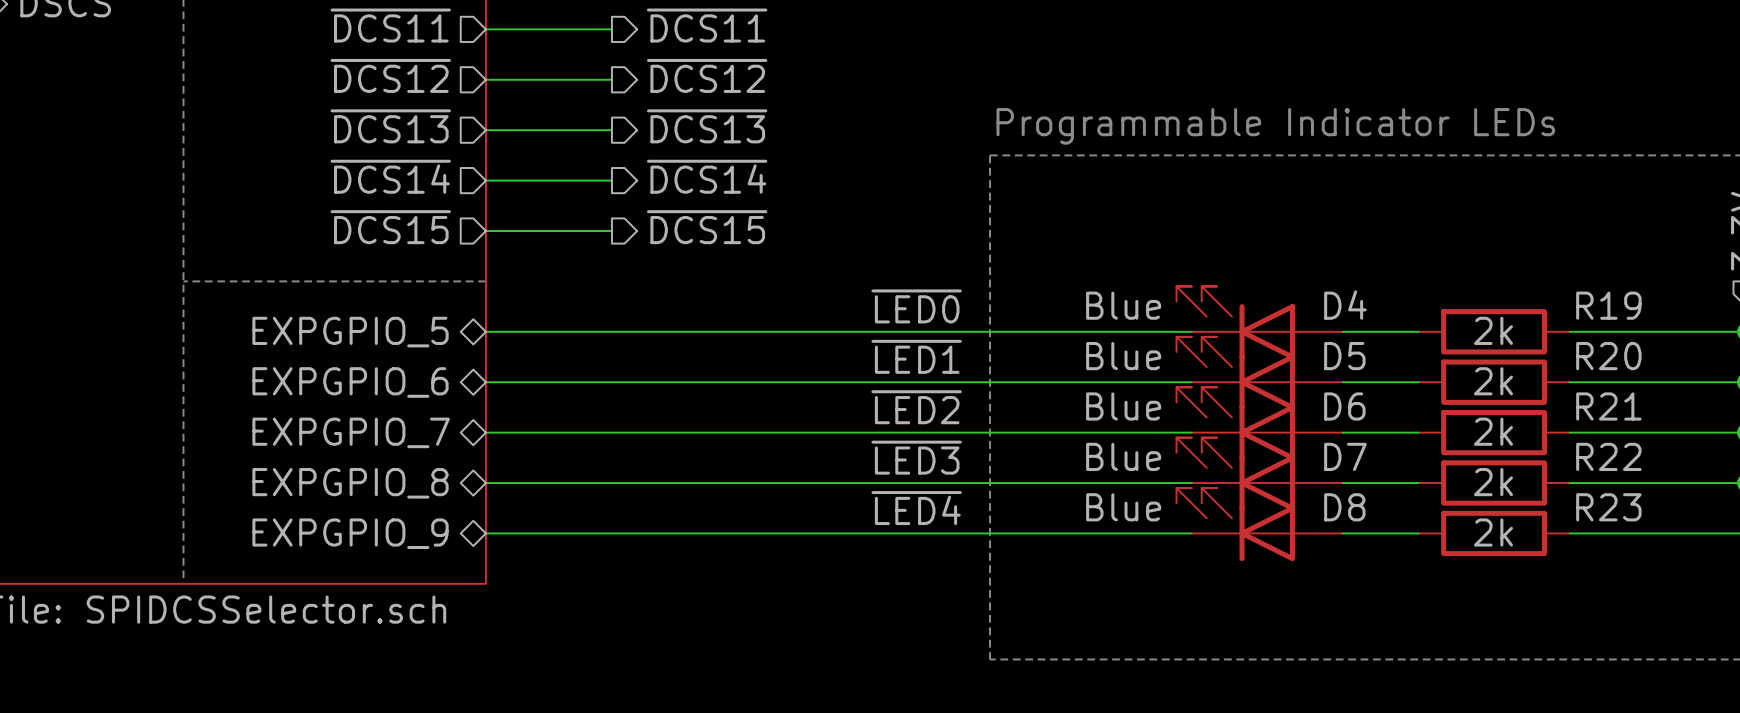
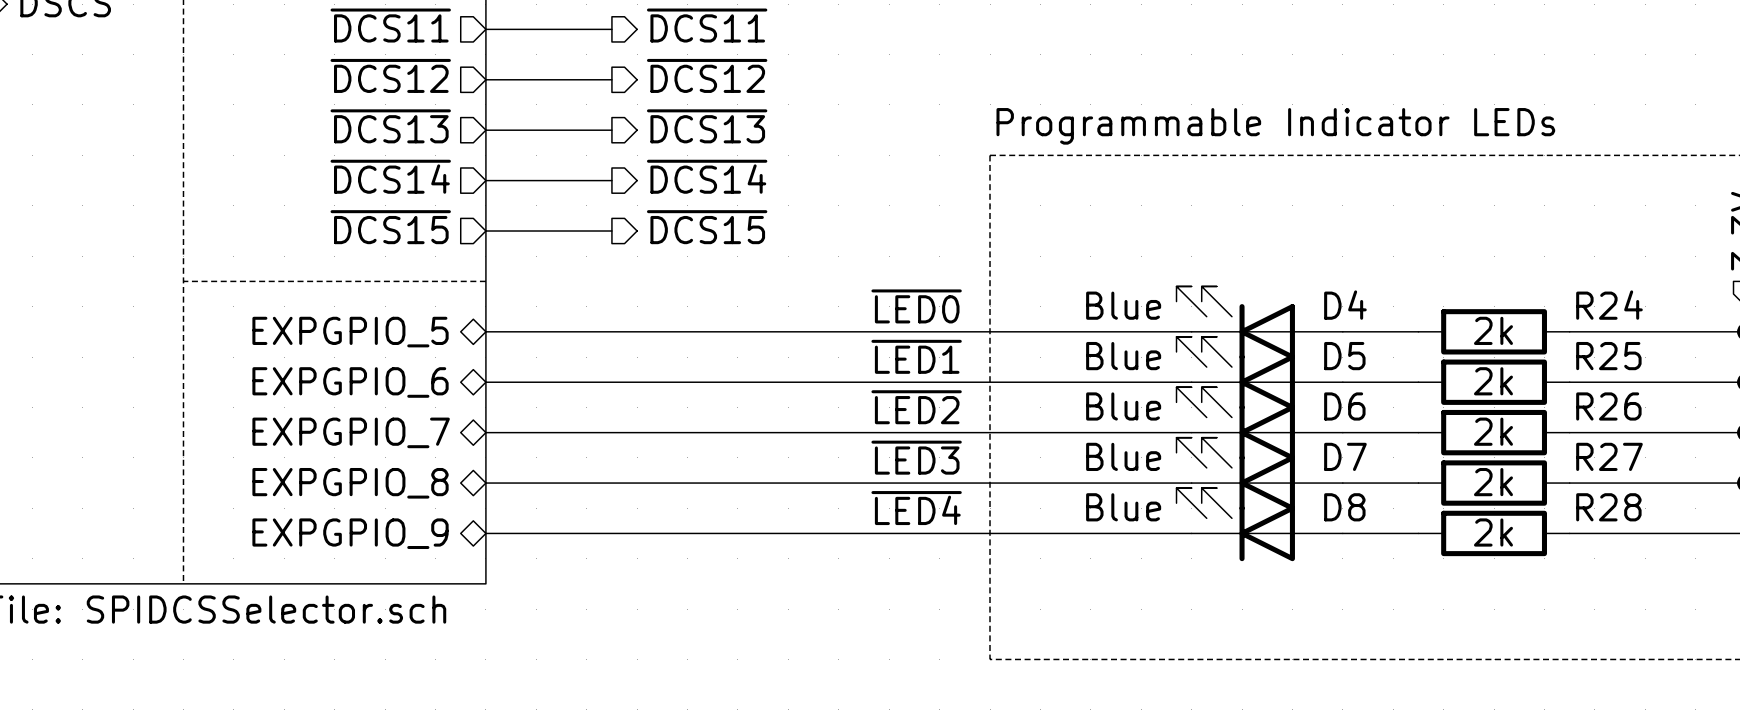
R19 name: R19 (1608, 305) -> R24 (1609, 305)
R20 name: R20 (1608, 356) -> R25 (1608, 356)
R21 name: R21 (1608, 406) -> R26 (1608, 406)
R22 name: R22 (1608, 456) -> R27 (1609, 456)
R23 name: R23 (1608, 507) -> R28 (1608, 507)

